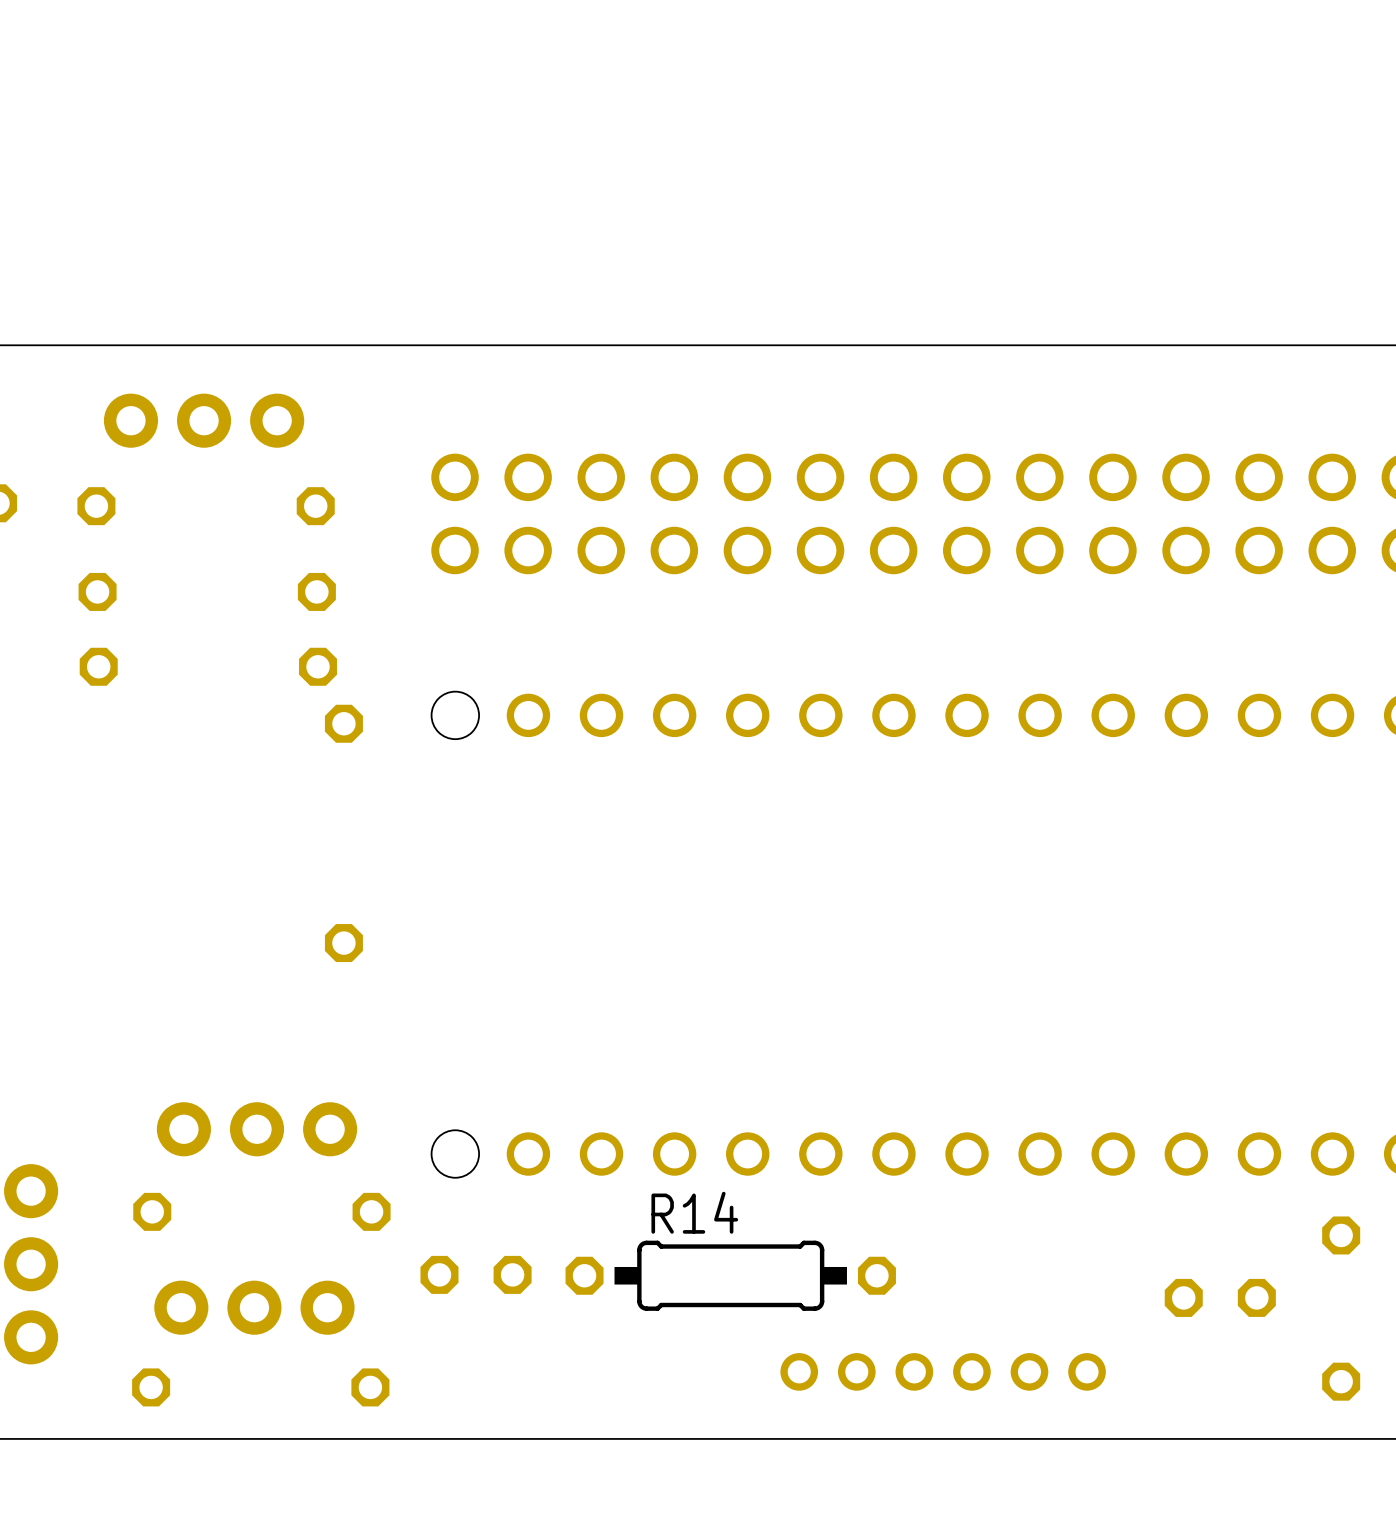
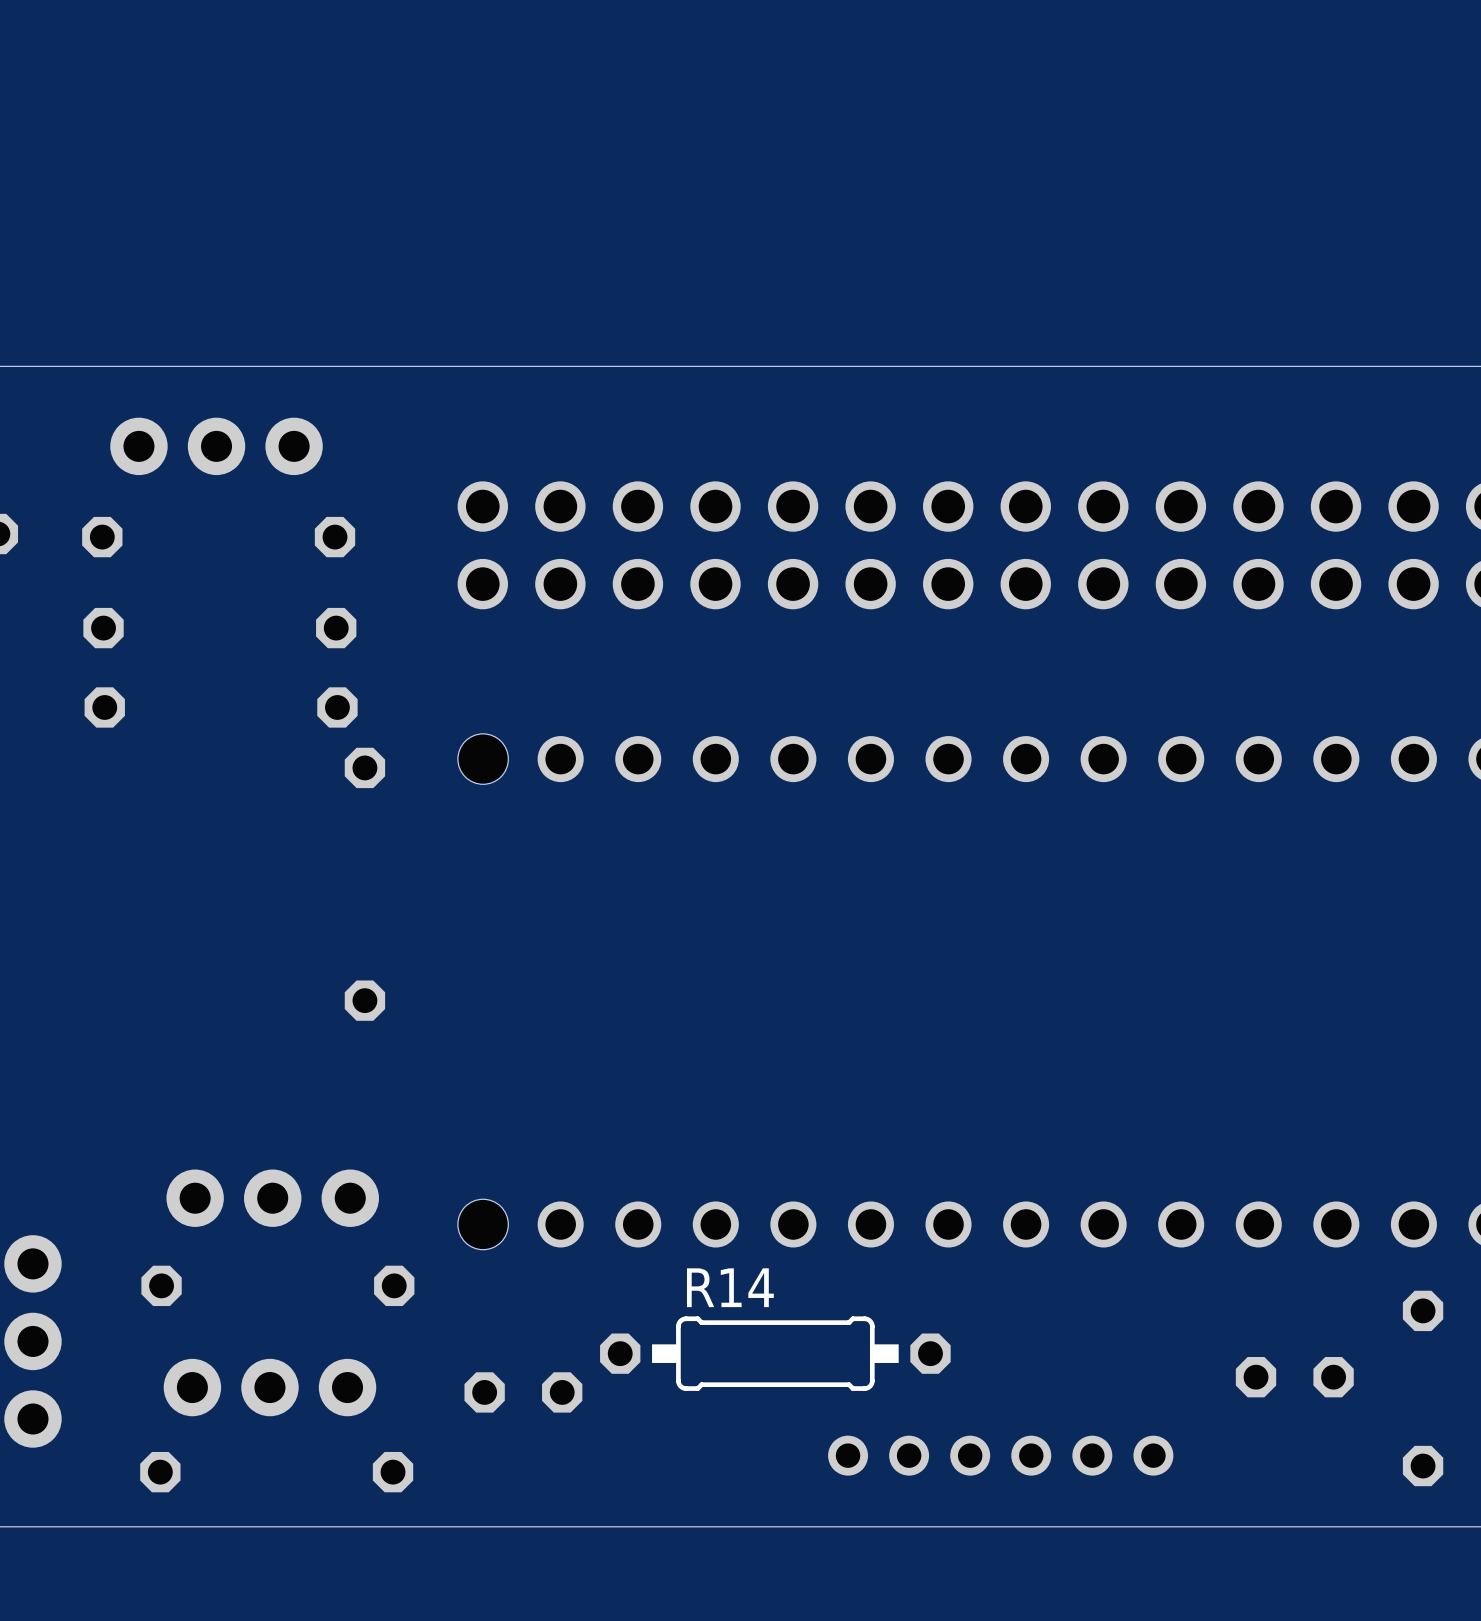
part position: (476, 1274) -> (523, 1392)

